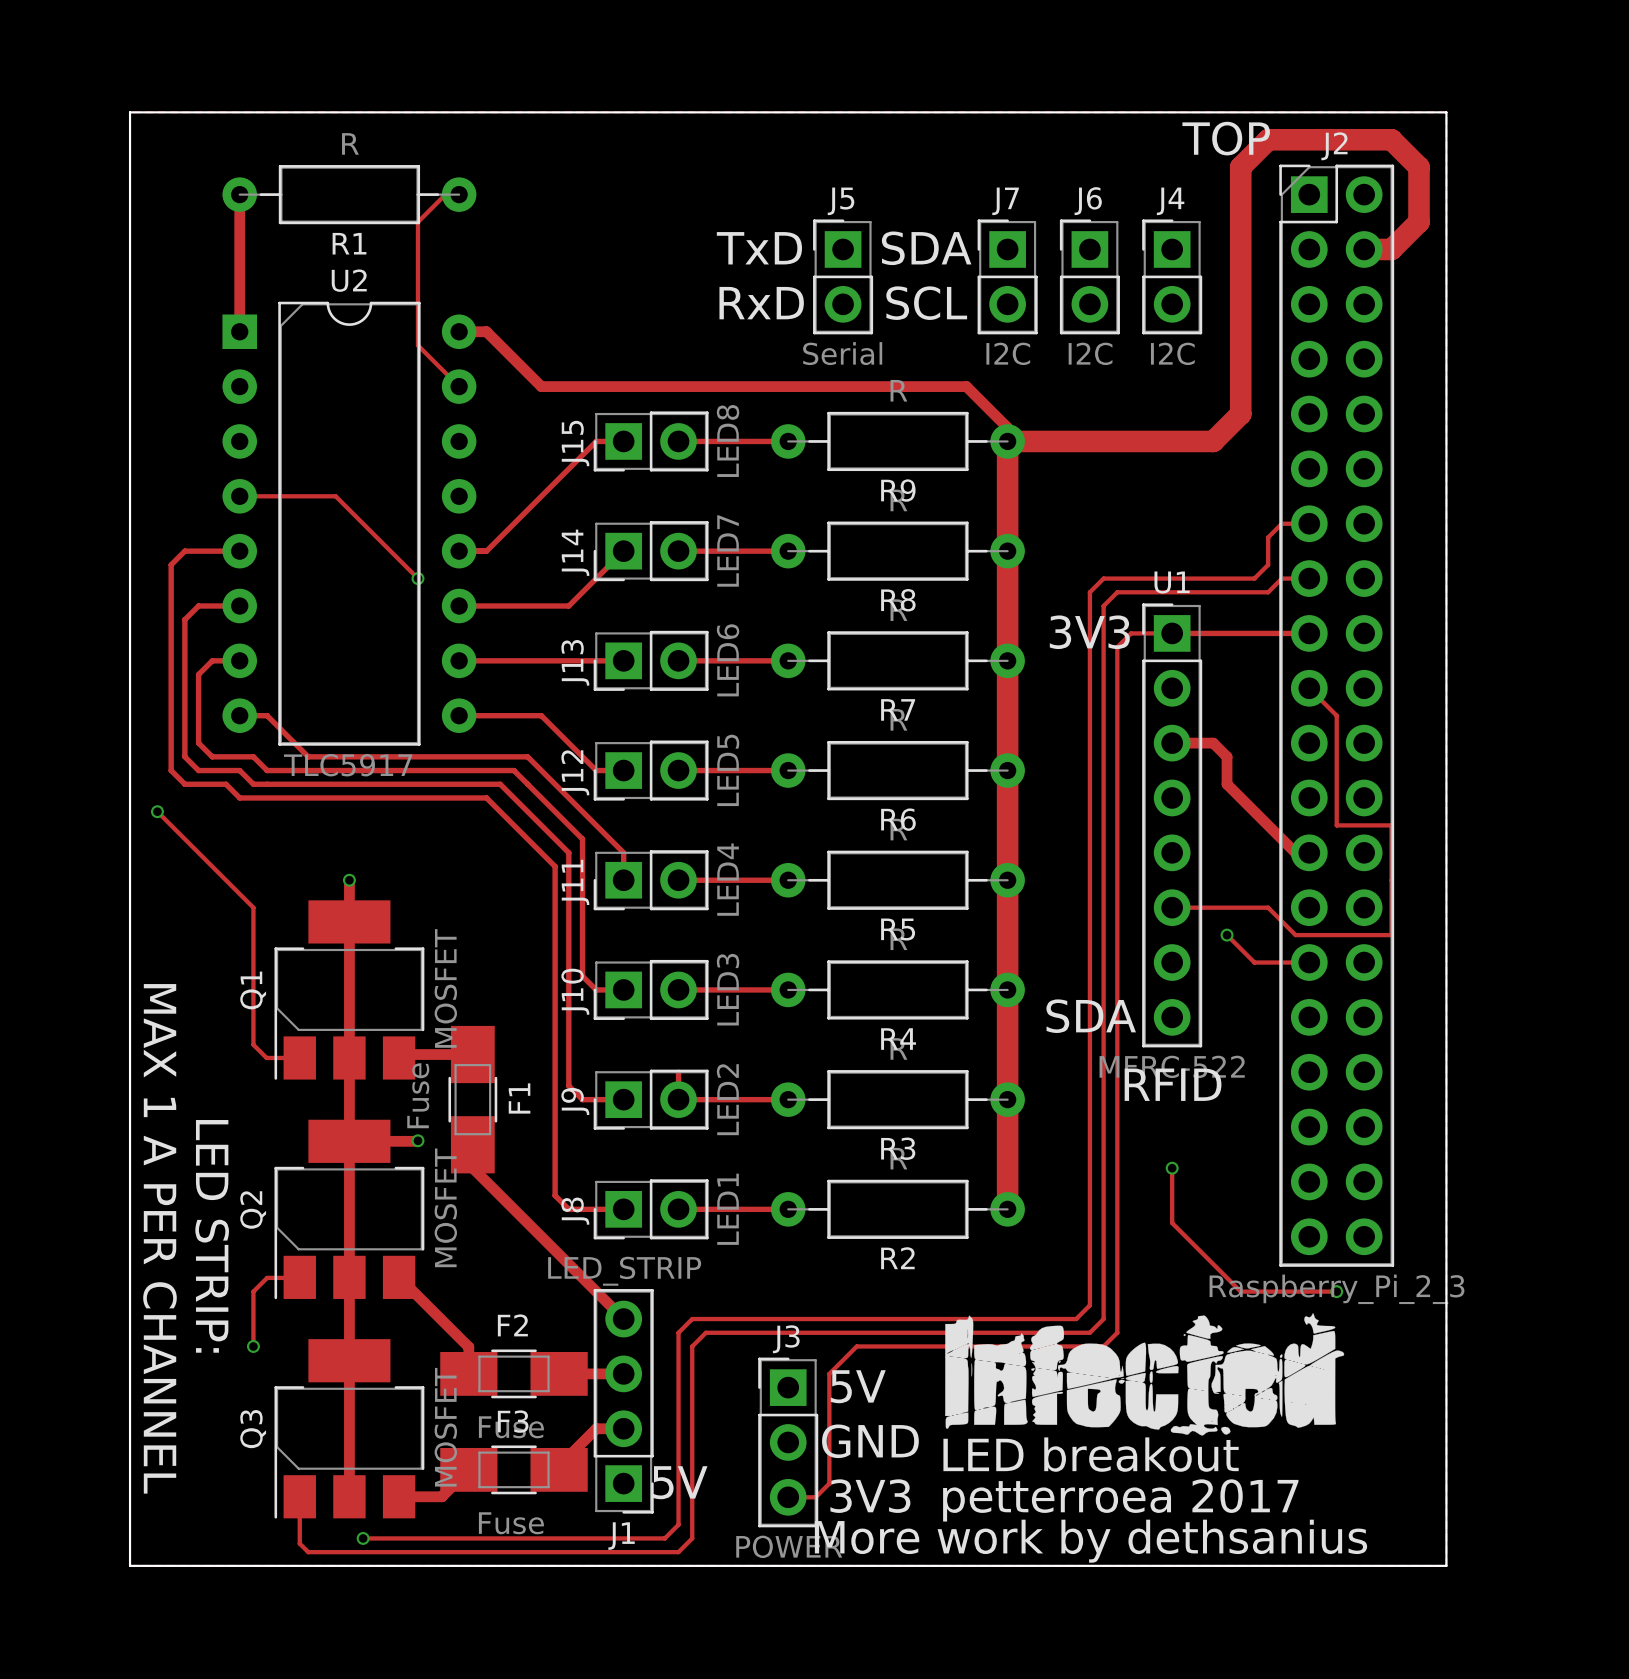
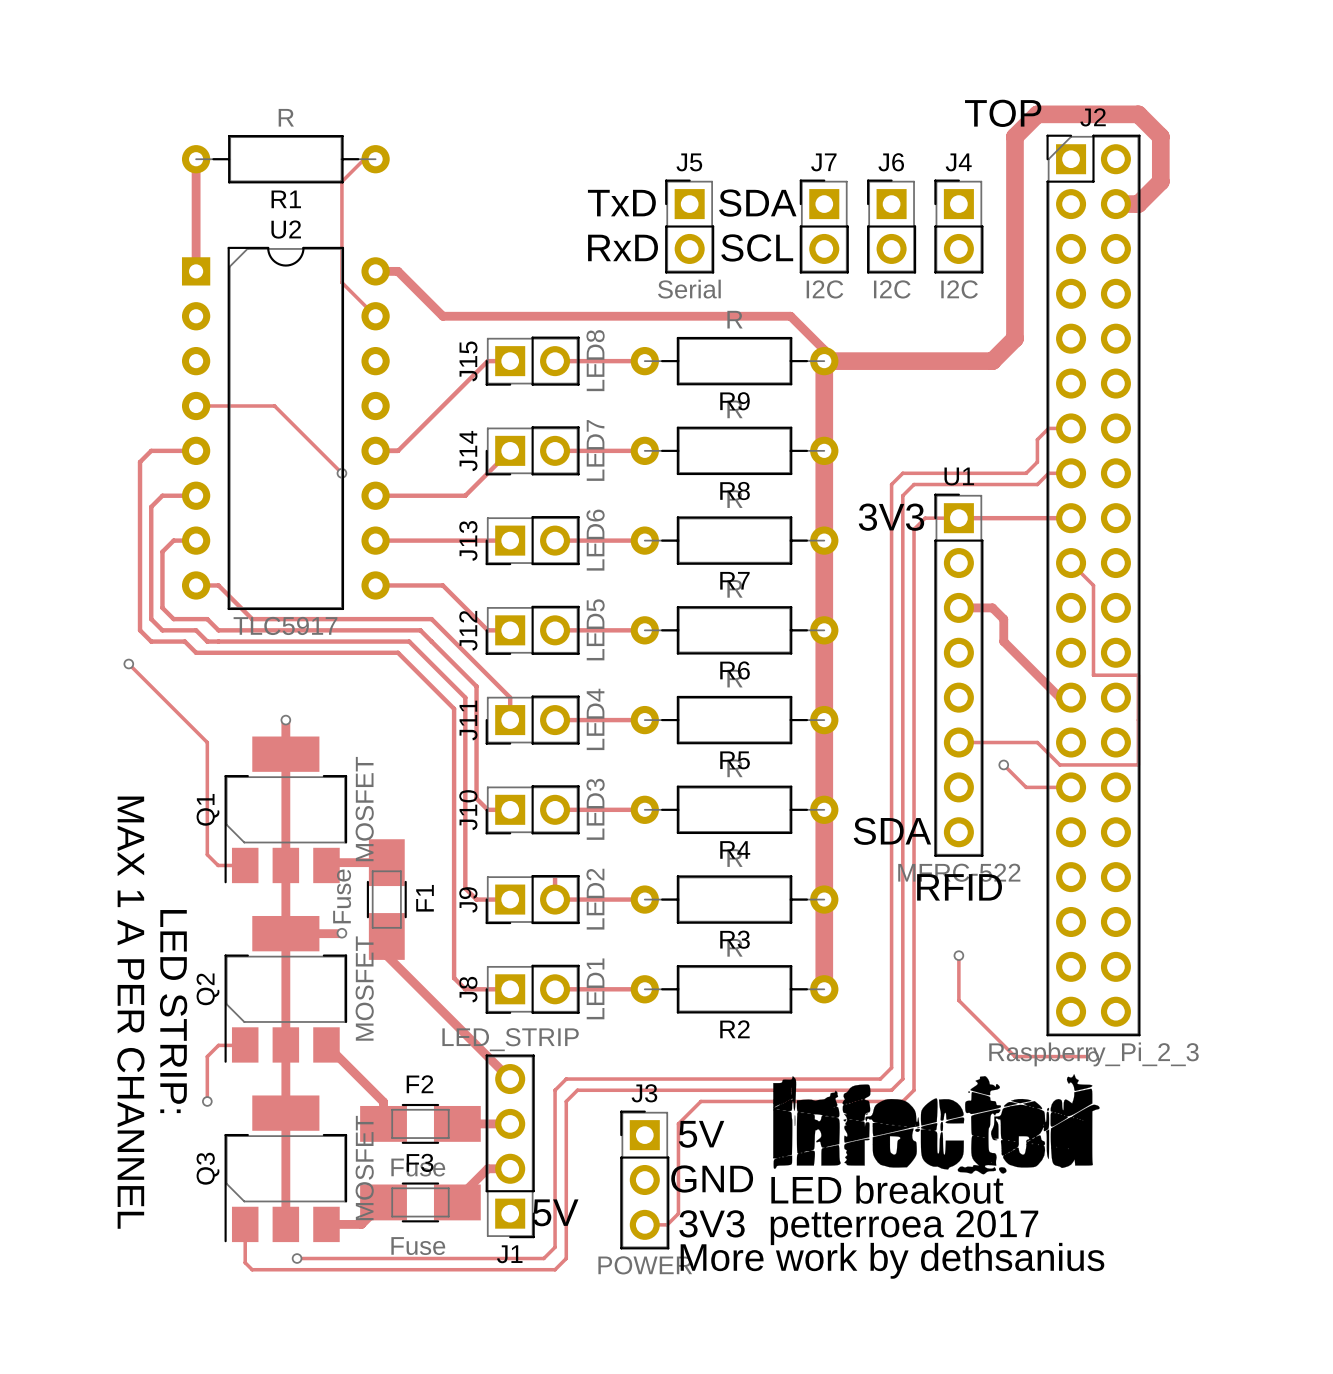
board edge: (130, 112) (130, 1565) (1446, 1565) (1446, 112) (130, 112) -> none

